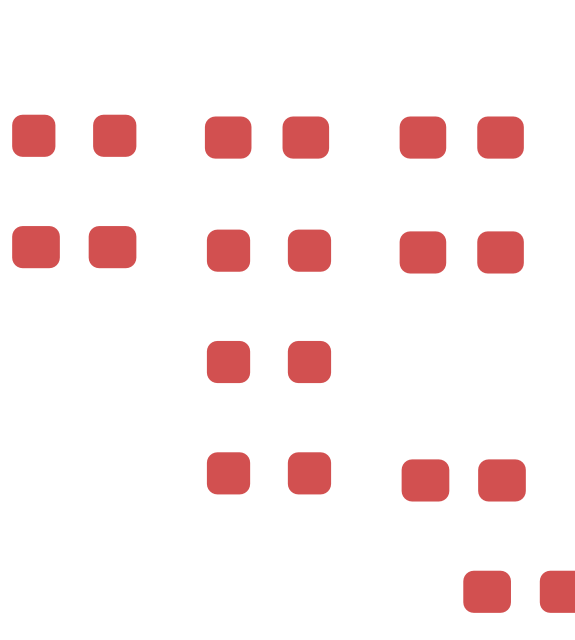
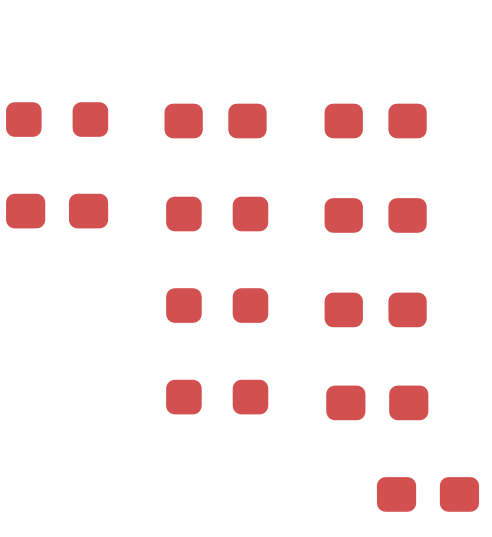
part: none -> (375, 309)

